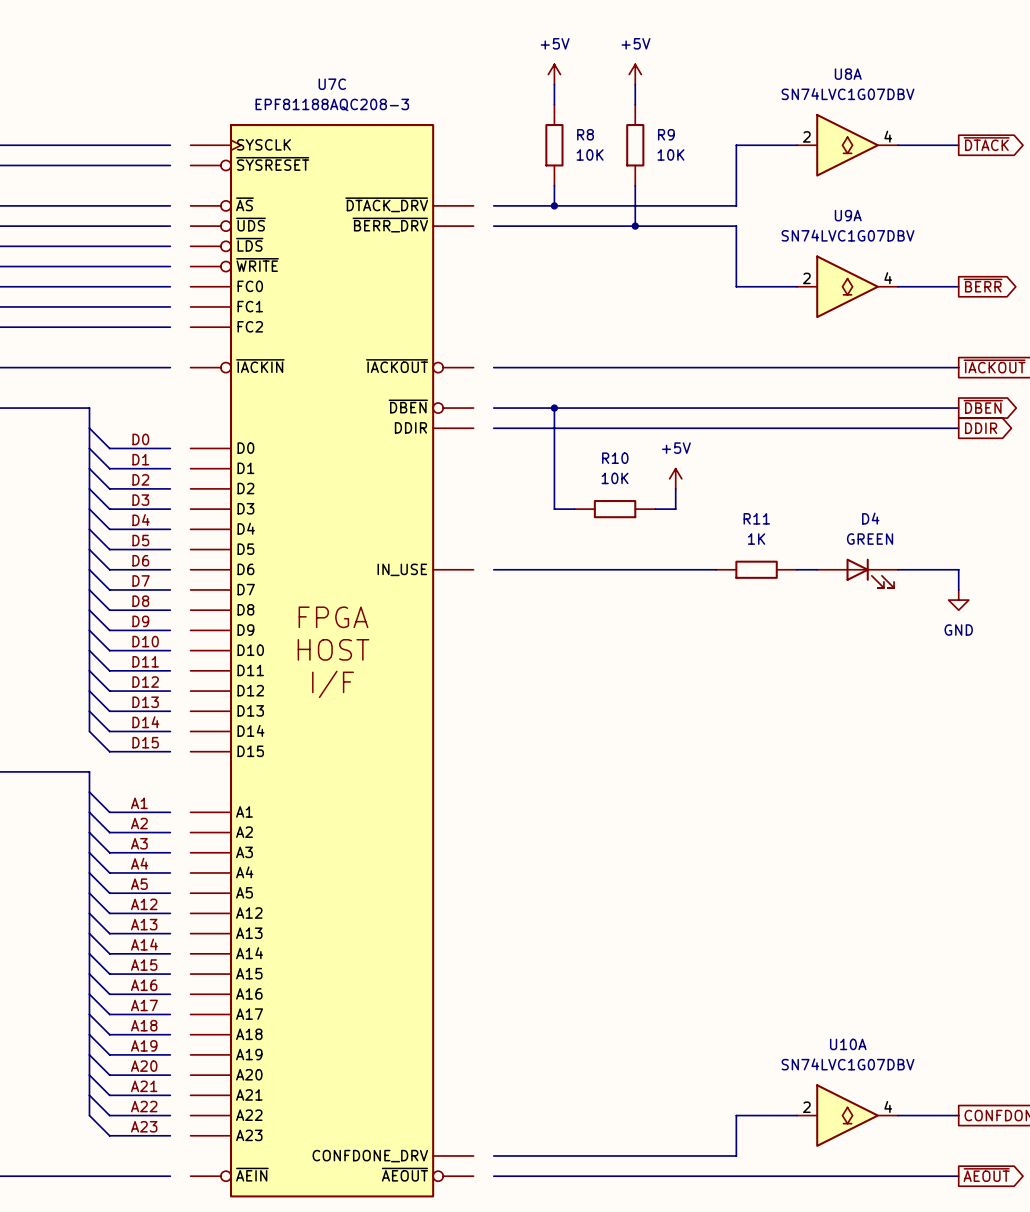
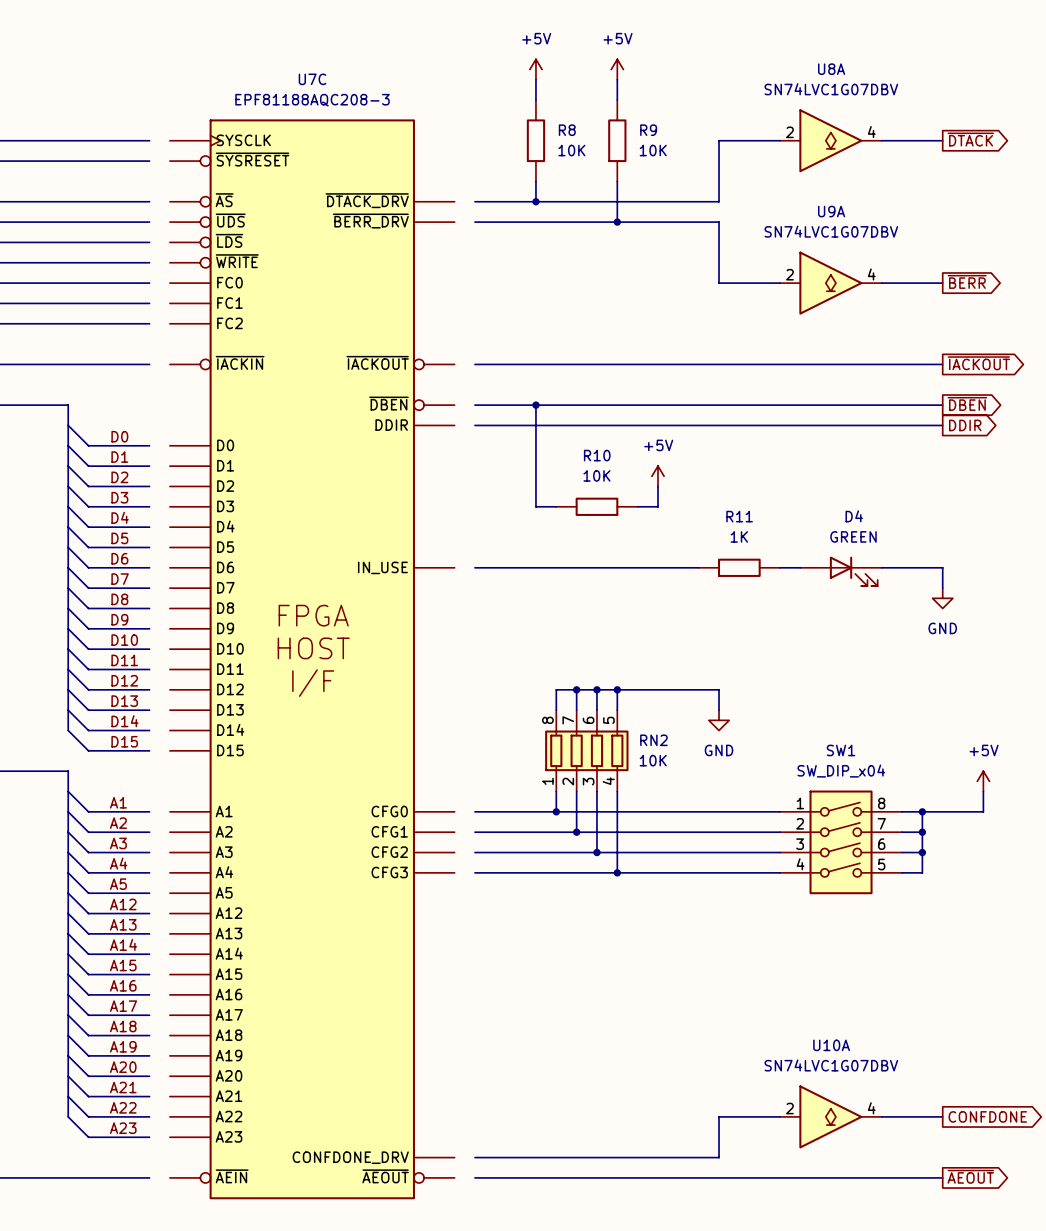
U7C symbol: [190, 124, 474, 1198] -> [169, 119, 455, 1200]
wire: none -> (576, 689) (576, 710)
junction: none -> (576, 689)
wire: none -> (596, 689) (596, 710)
junction: none -> (596, 689)
wire: none -> (617, 689) (617, 710)
junction: none -> (617, 689)
wire: none -> (556, 710) (556, 689) (719, 689) (719, 710)
power symbol: none -> GND (719, 720)
RN2: none -> 10K (586, 750)
power symbol: none -> +5V (983, 781)
wire: none -> (556, 791) (556, 811)
wire: none -> (576, 791) (576, 832)
wire: none -> (596, 791) (596, 852)
wire: none -> (617, 791) (617, 872)
wire: none -> (983, 791) (983, 811) (902, 811)
wire: none -> (474, 811) (780, 811)
junction: none -> (556, 811)
wire: none -> (922, 811) (922, 872) (902, 872)
junction: none -> (922, 811)
wire: none -> (474, 832) (780, 832)
junction: none -> (576, 832)
wire: none -> (902, 832) (922, 832)
junction: none -> (922, 832)
SW1: none -> SW_DIP_x04 (841, 842)
wire: none -> (474, 852) (780, 852)
junction: none -> (596, 852)
wire: none -> (902, 852) (922, 852)
junction: none -> (922, 852)
wire: none -> (474, 872) (780, 872)
junction: none -> (617, 872)

